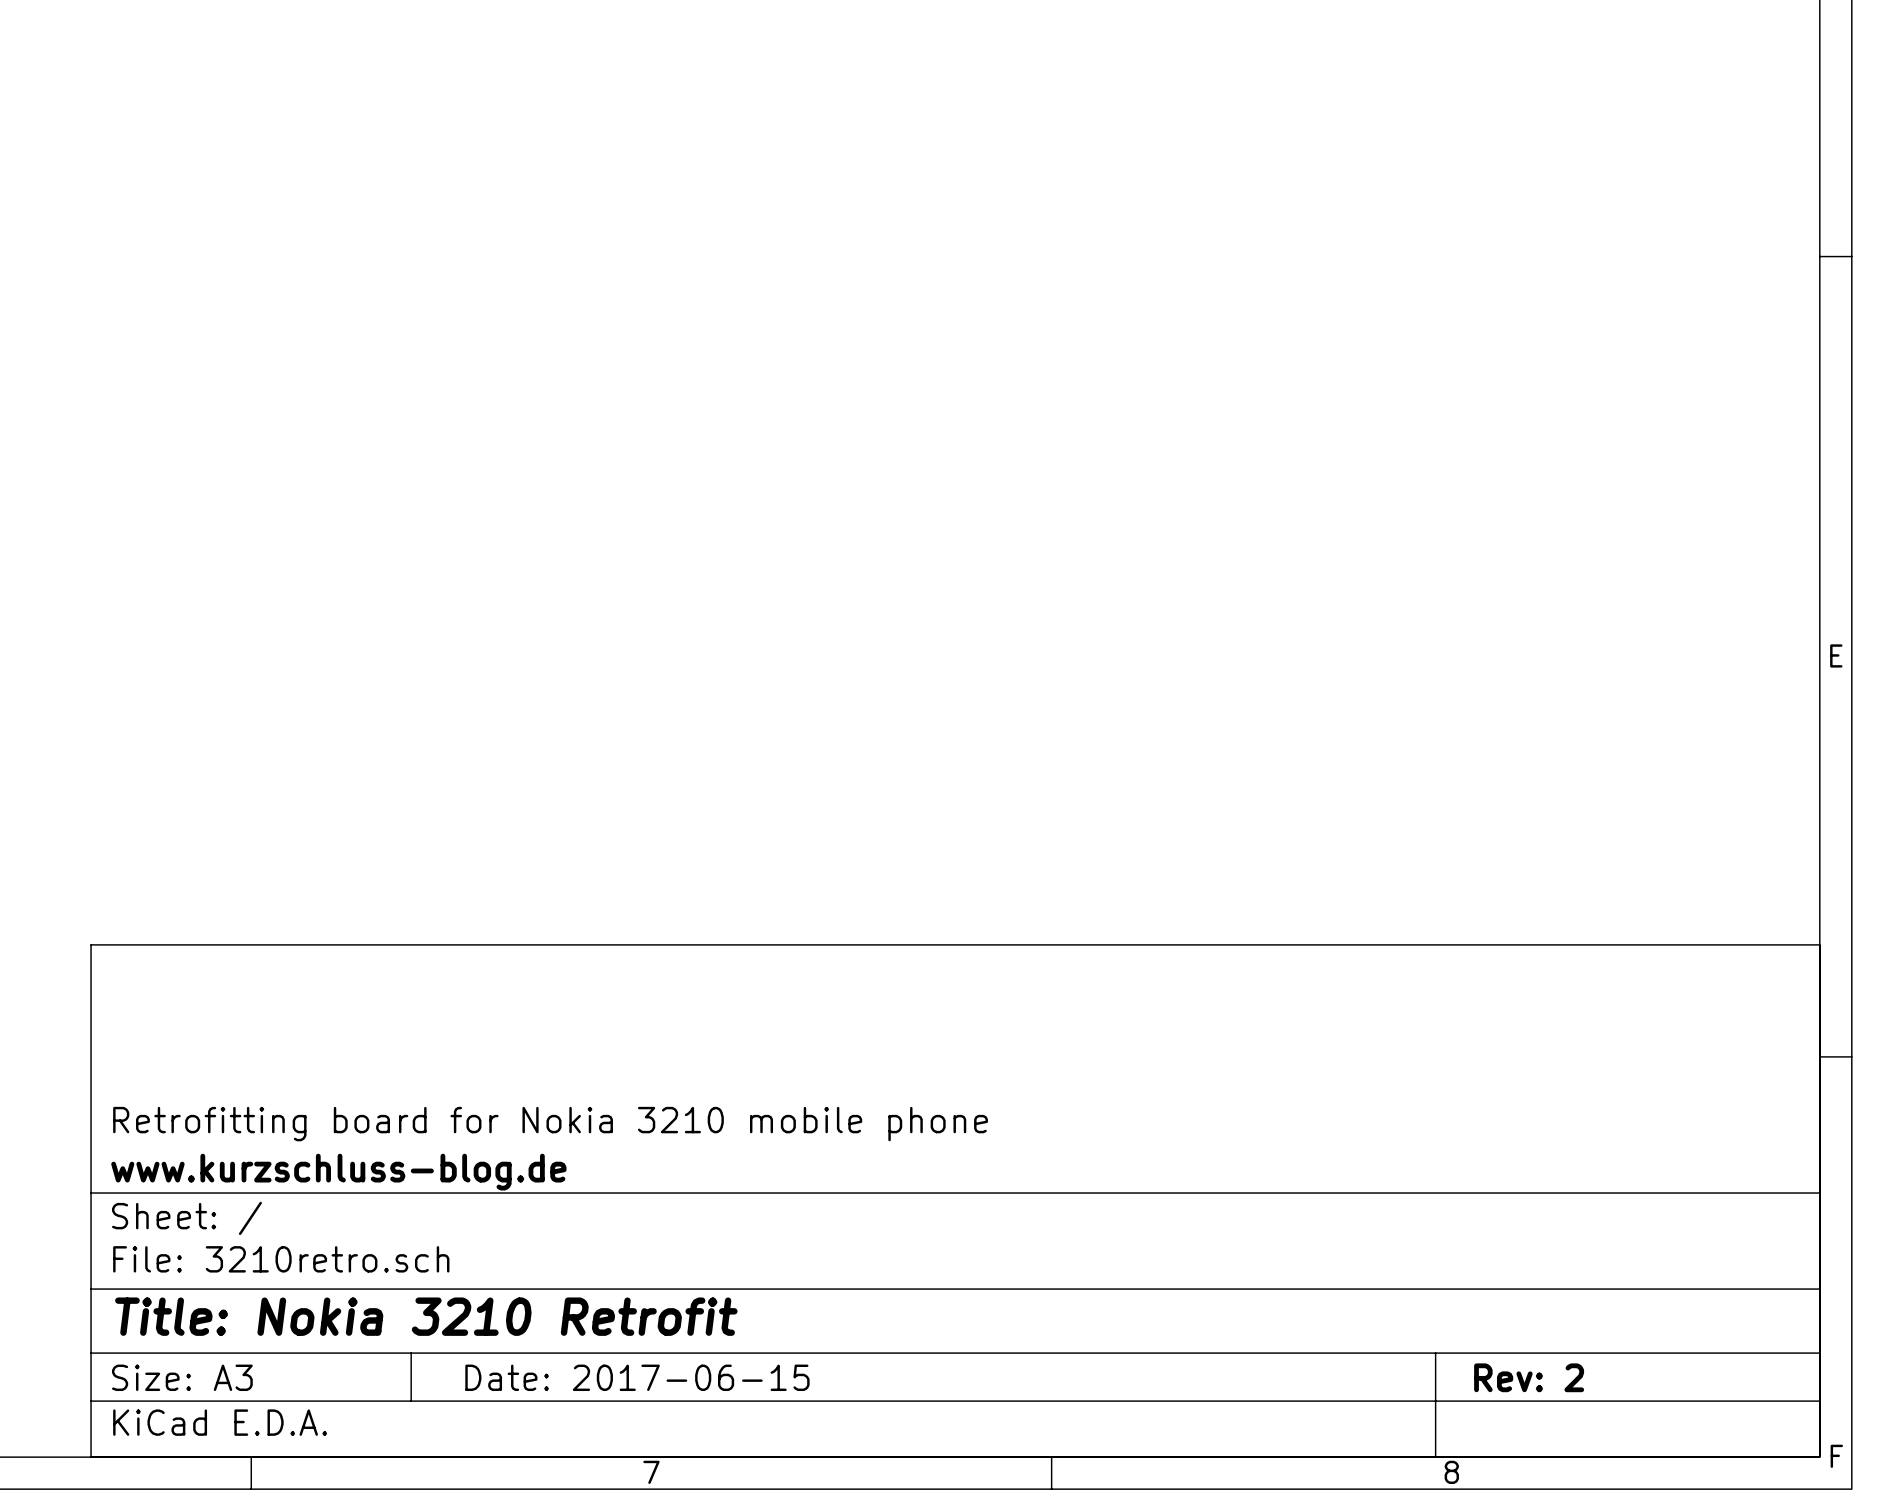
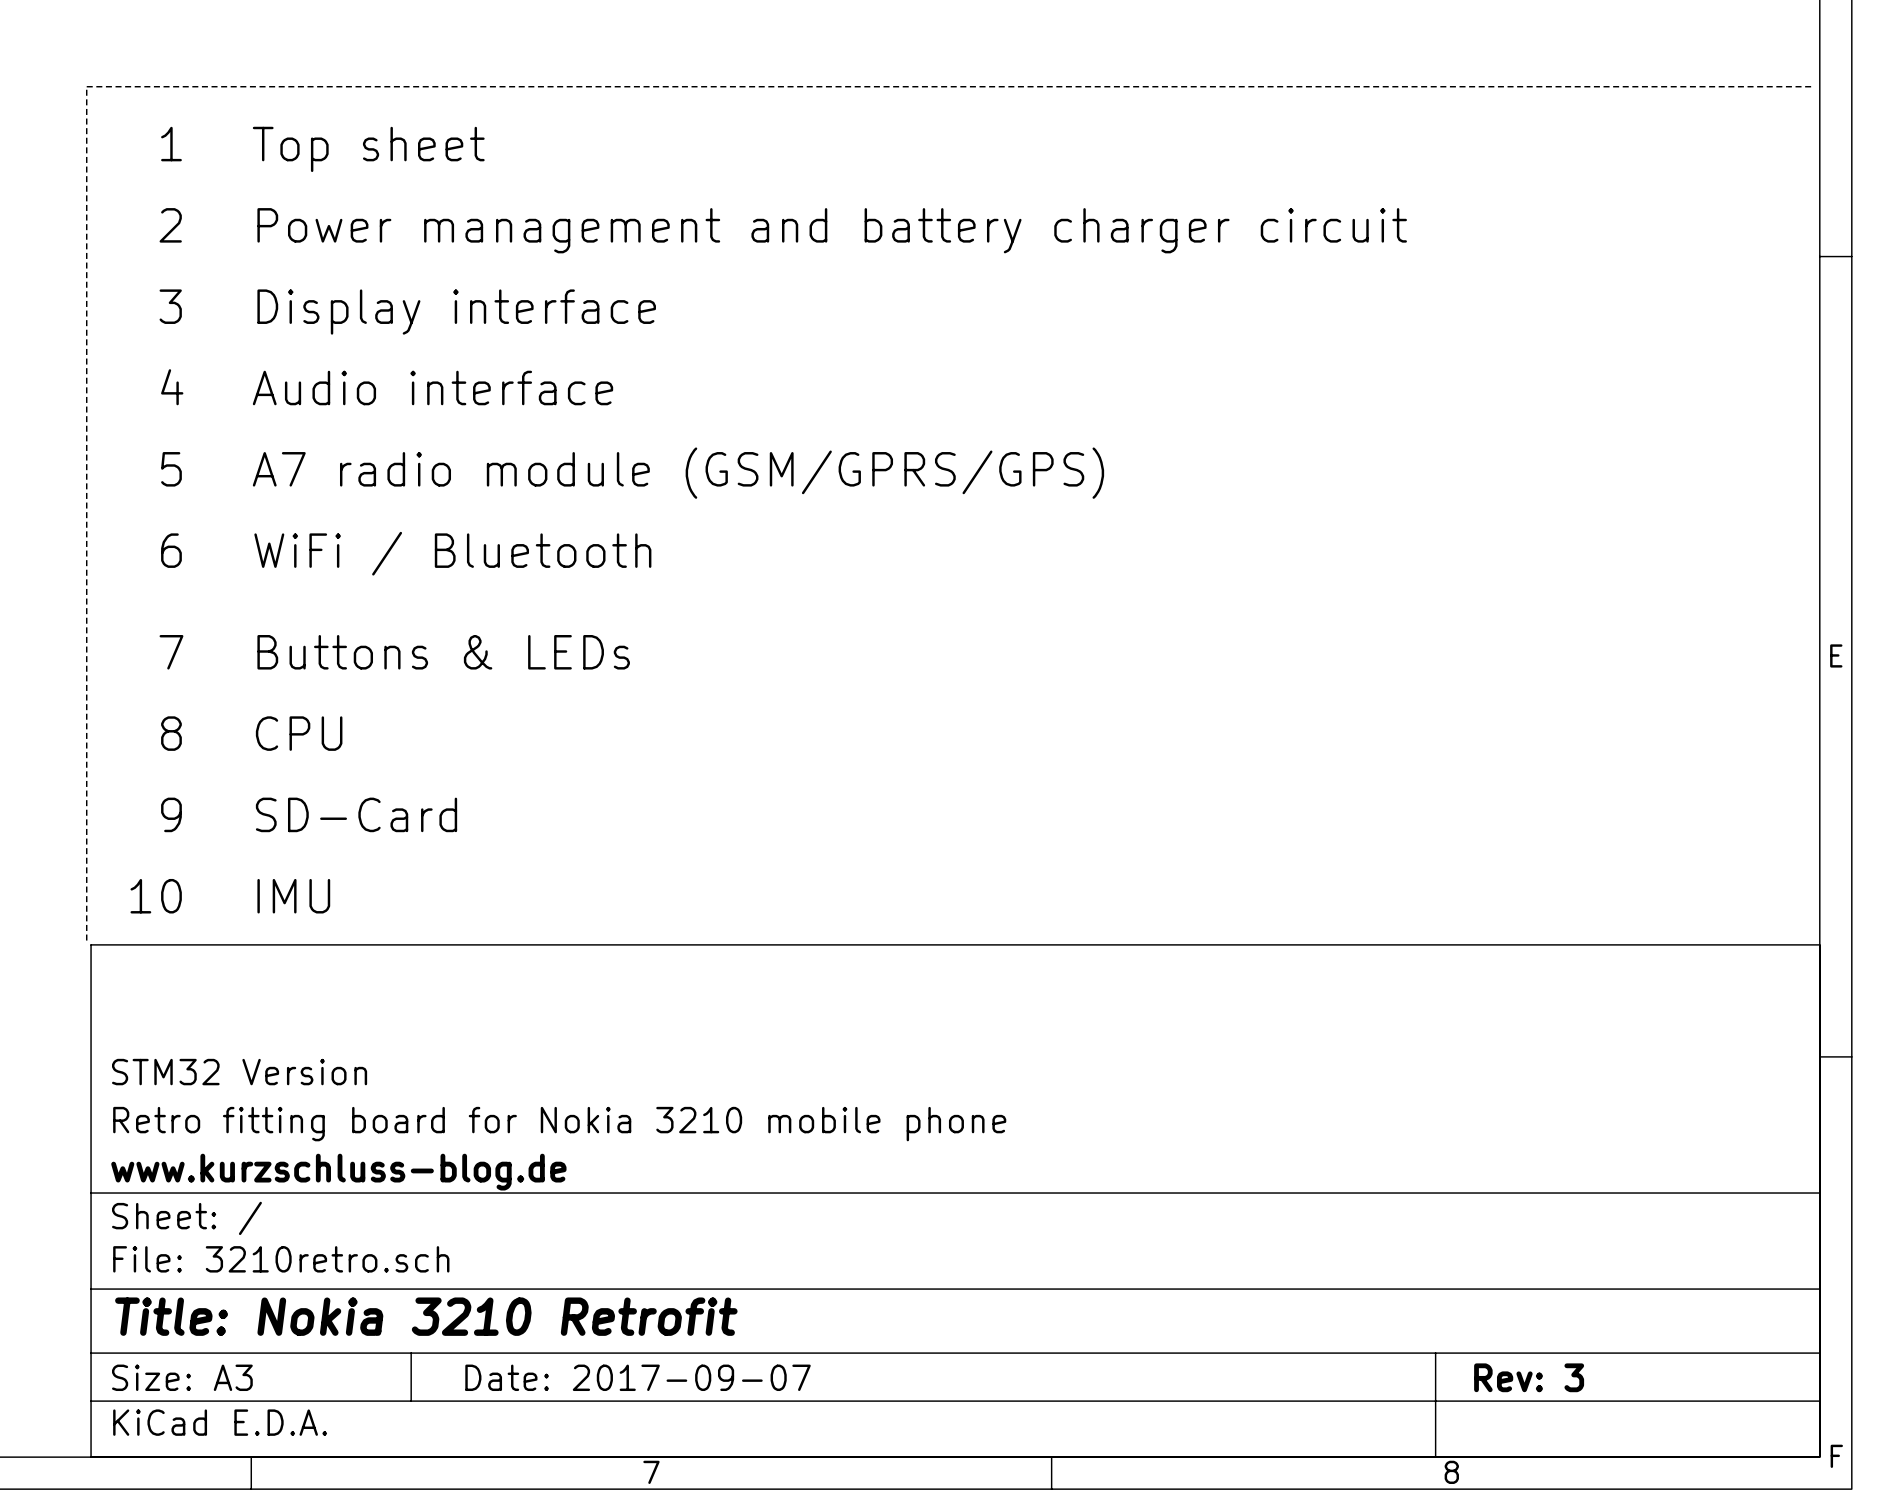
line: none -> (1814, 86) (86, 86) (86, 940)
text: none -> 1 (171, 144)
text: none -> Top sheet (368, 149)
text: none -> 2 (170, 225)
text: none -> Power management and battery charger circuit (832, 230)
text: none -> 3 (170, 306)
text: none -> Display interface (456, 312)
text: none -> 4 (172, 387)
text: none -> Audio interface (432, 388)
text: none -> 5 (171, 469)
text: none -> A7 radio module (GSM/GPRS/GPS) (678, 473)
text: none -> 6 (171, 550)
text: none -> WiFi / Bluetooth (452, 553)
text: none -> 7 (171, 652)
text: none -> Buttons & LEDs (443, 652)
text: none -> 8 (171, 733)
text: none -> CPU (299, 733)
text: none -> 9 (171, 814)
text: none -> SD-Card (356, 814)
text: none -> 10 (156, 896)
text: none -> IMU (293, 896)
title block: none -> STM32 Version (239, 1072)
title block: Retrofitting board for Nokia 3210 mobile phone (550, 1124) -> Retro fitting board for Nokia 3210 mobile phone (559, 1124)
title block: Date: 2017-06-15 (637, 1377) -> Date: 2017-09-07 (638, 1377)
title block: Rev: 2 (1529, 1377) -> Rev: 3 (1529, 1377)

